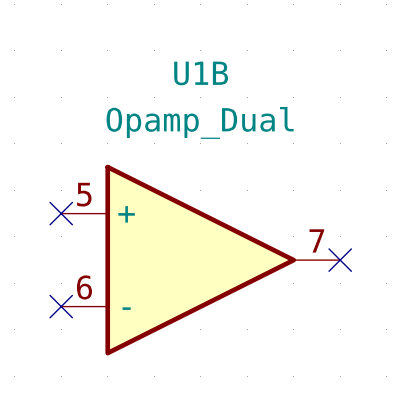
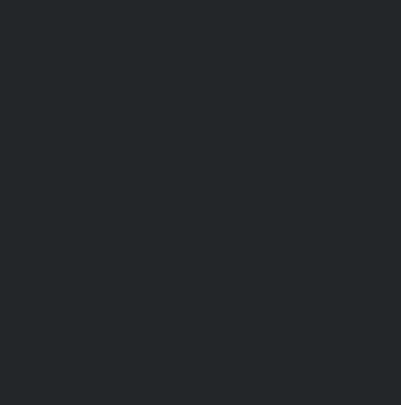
no-connect mark: (61, 213) -> none
U1B: Opamp_Dual (200, 260) -> none
no-connect mark: (340, 260) -> none
no-connect mark: (61, 306) -> none

